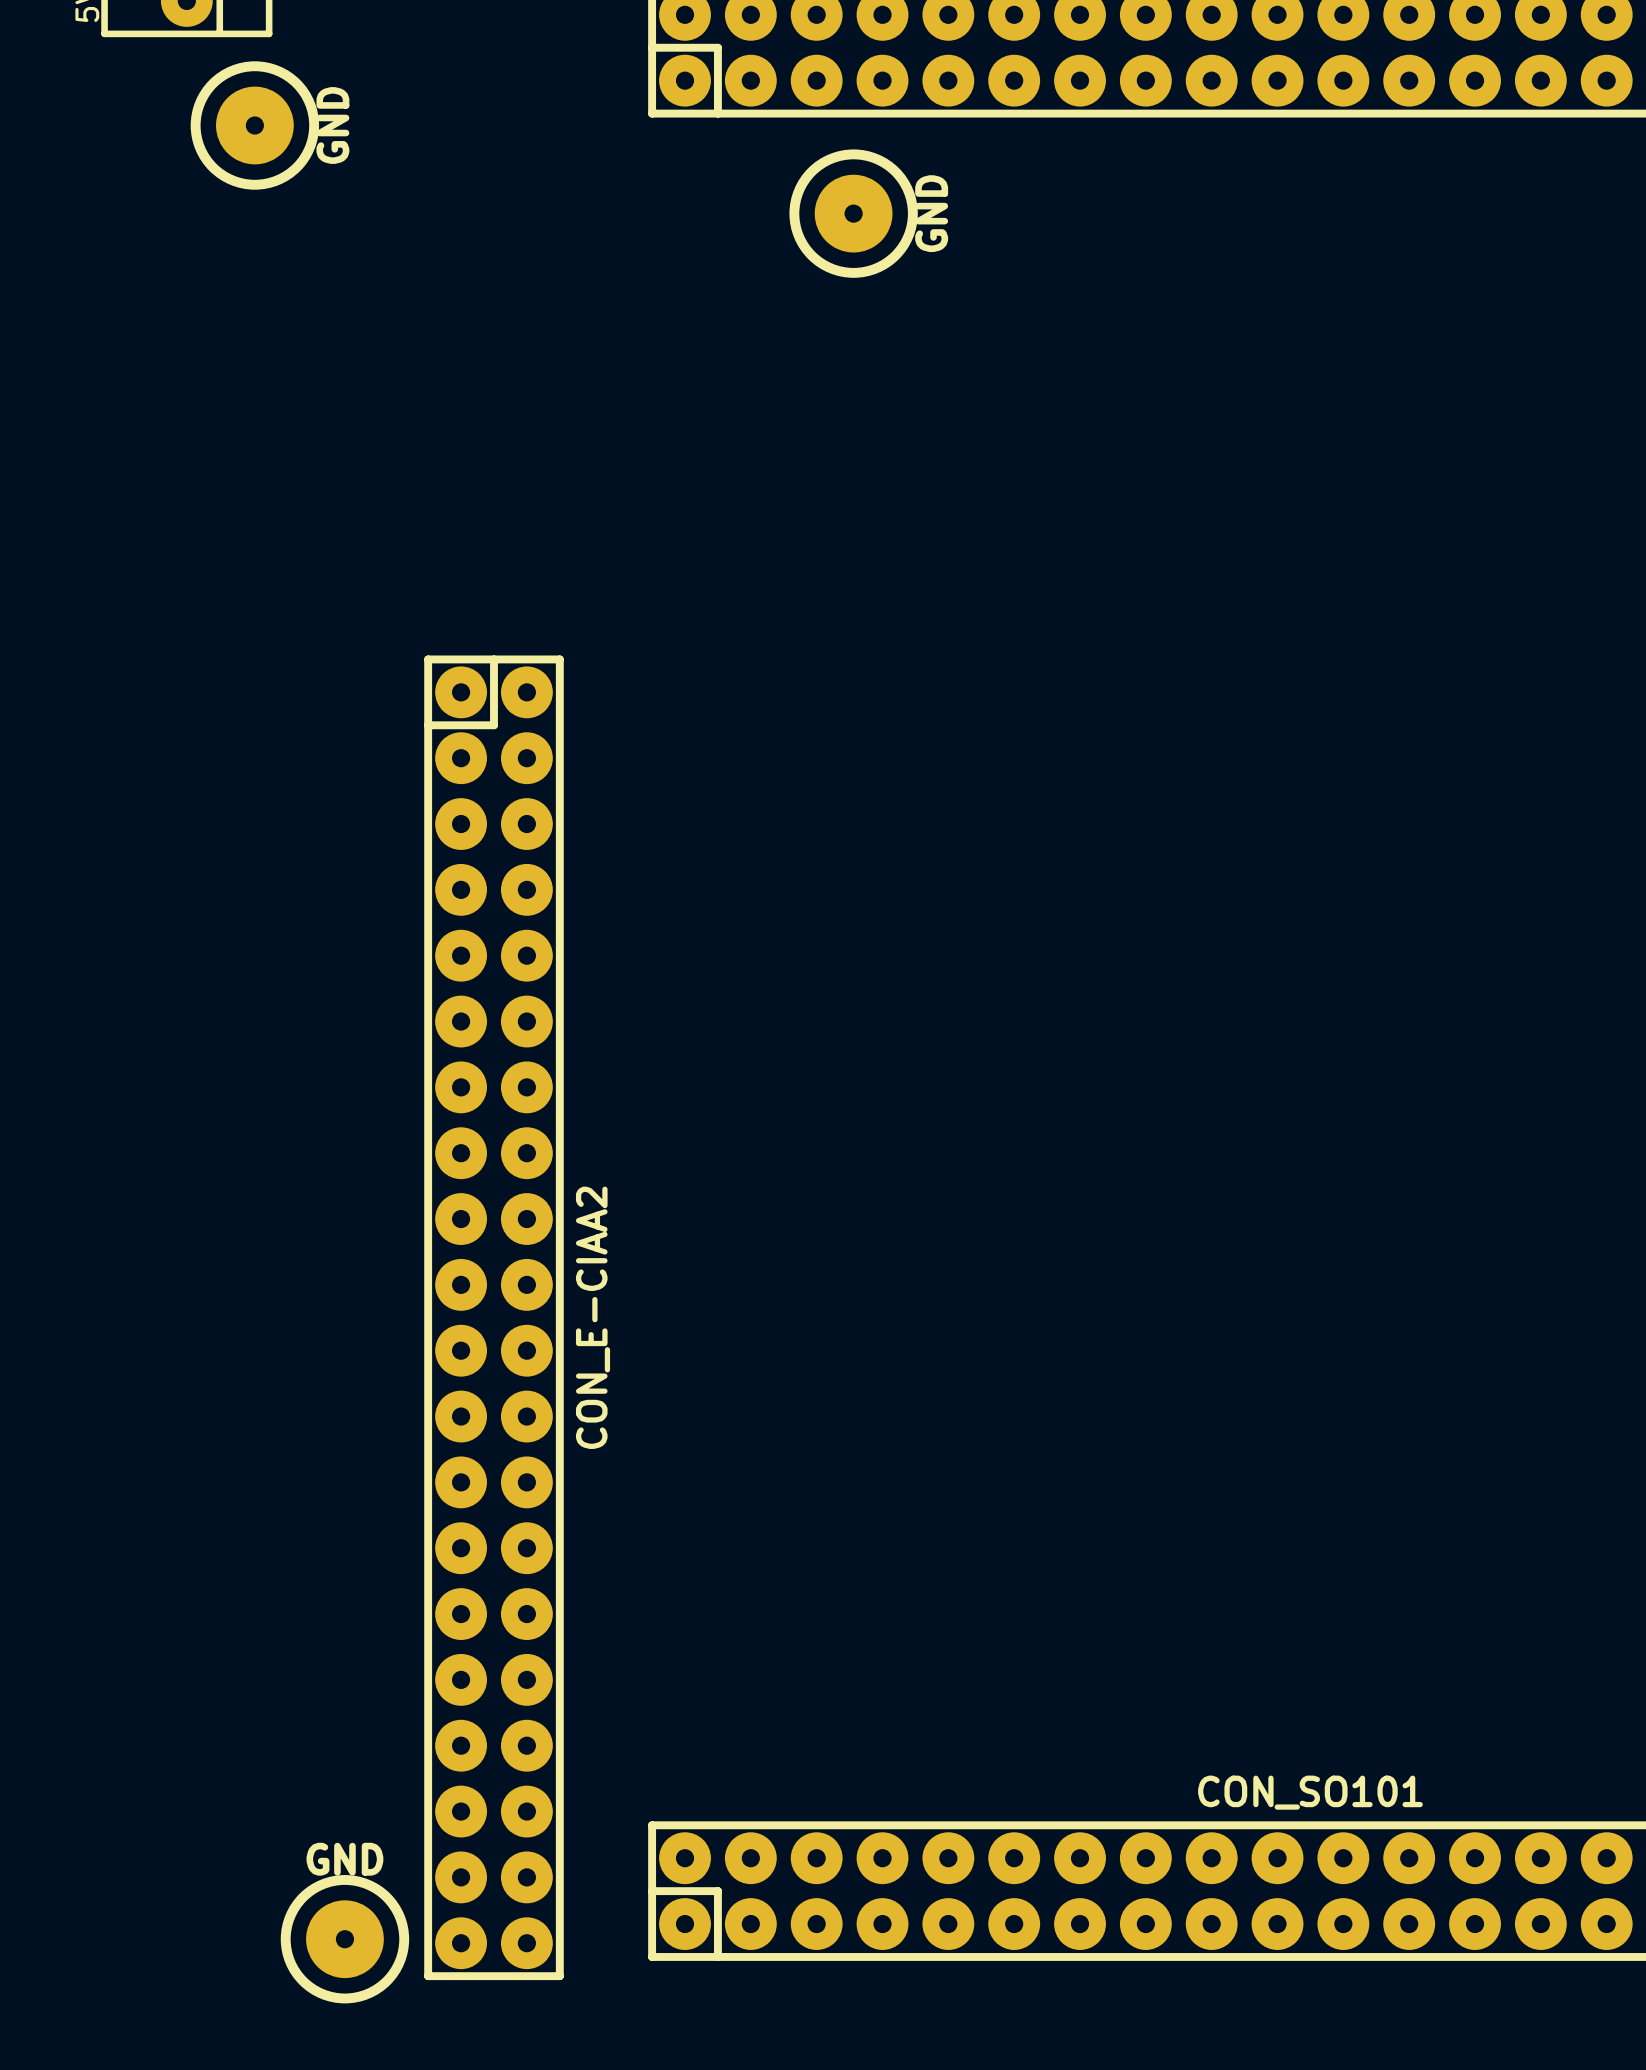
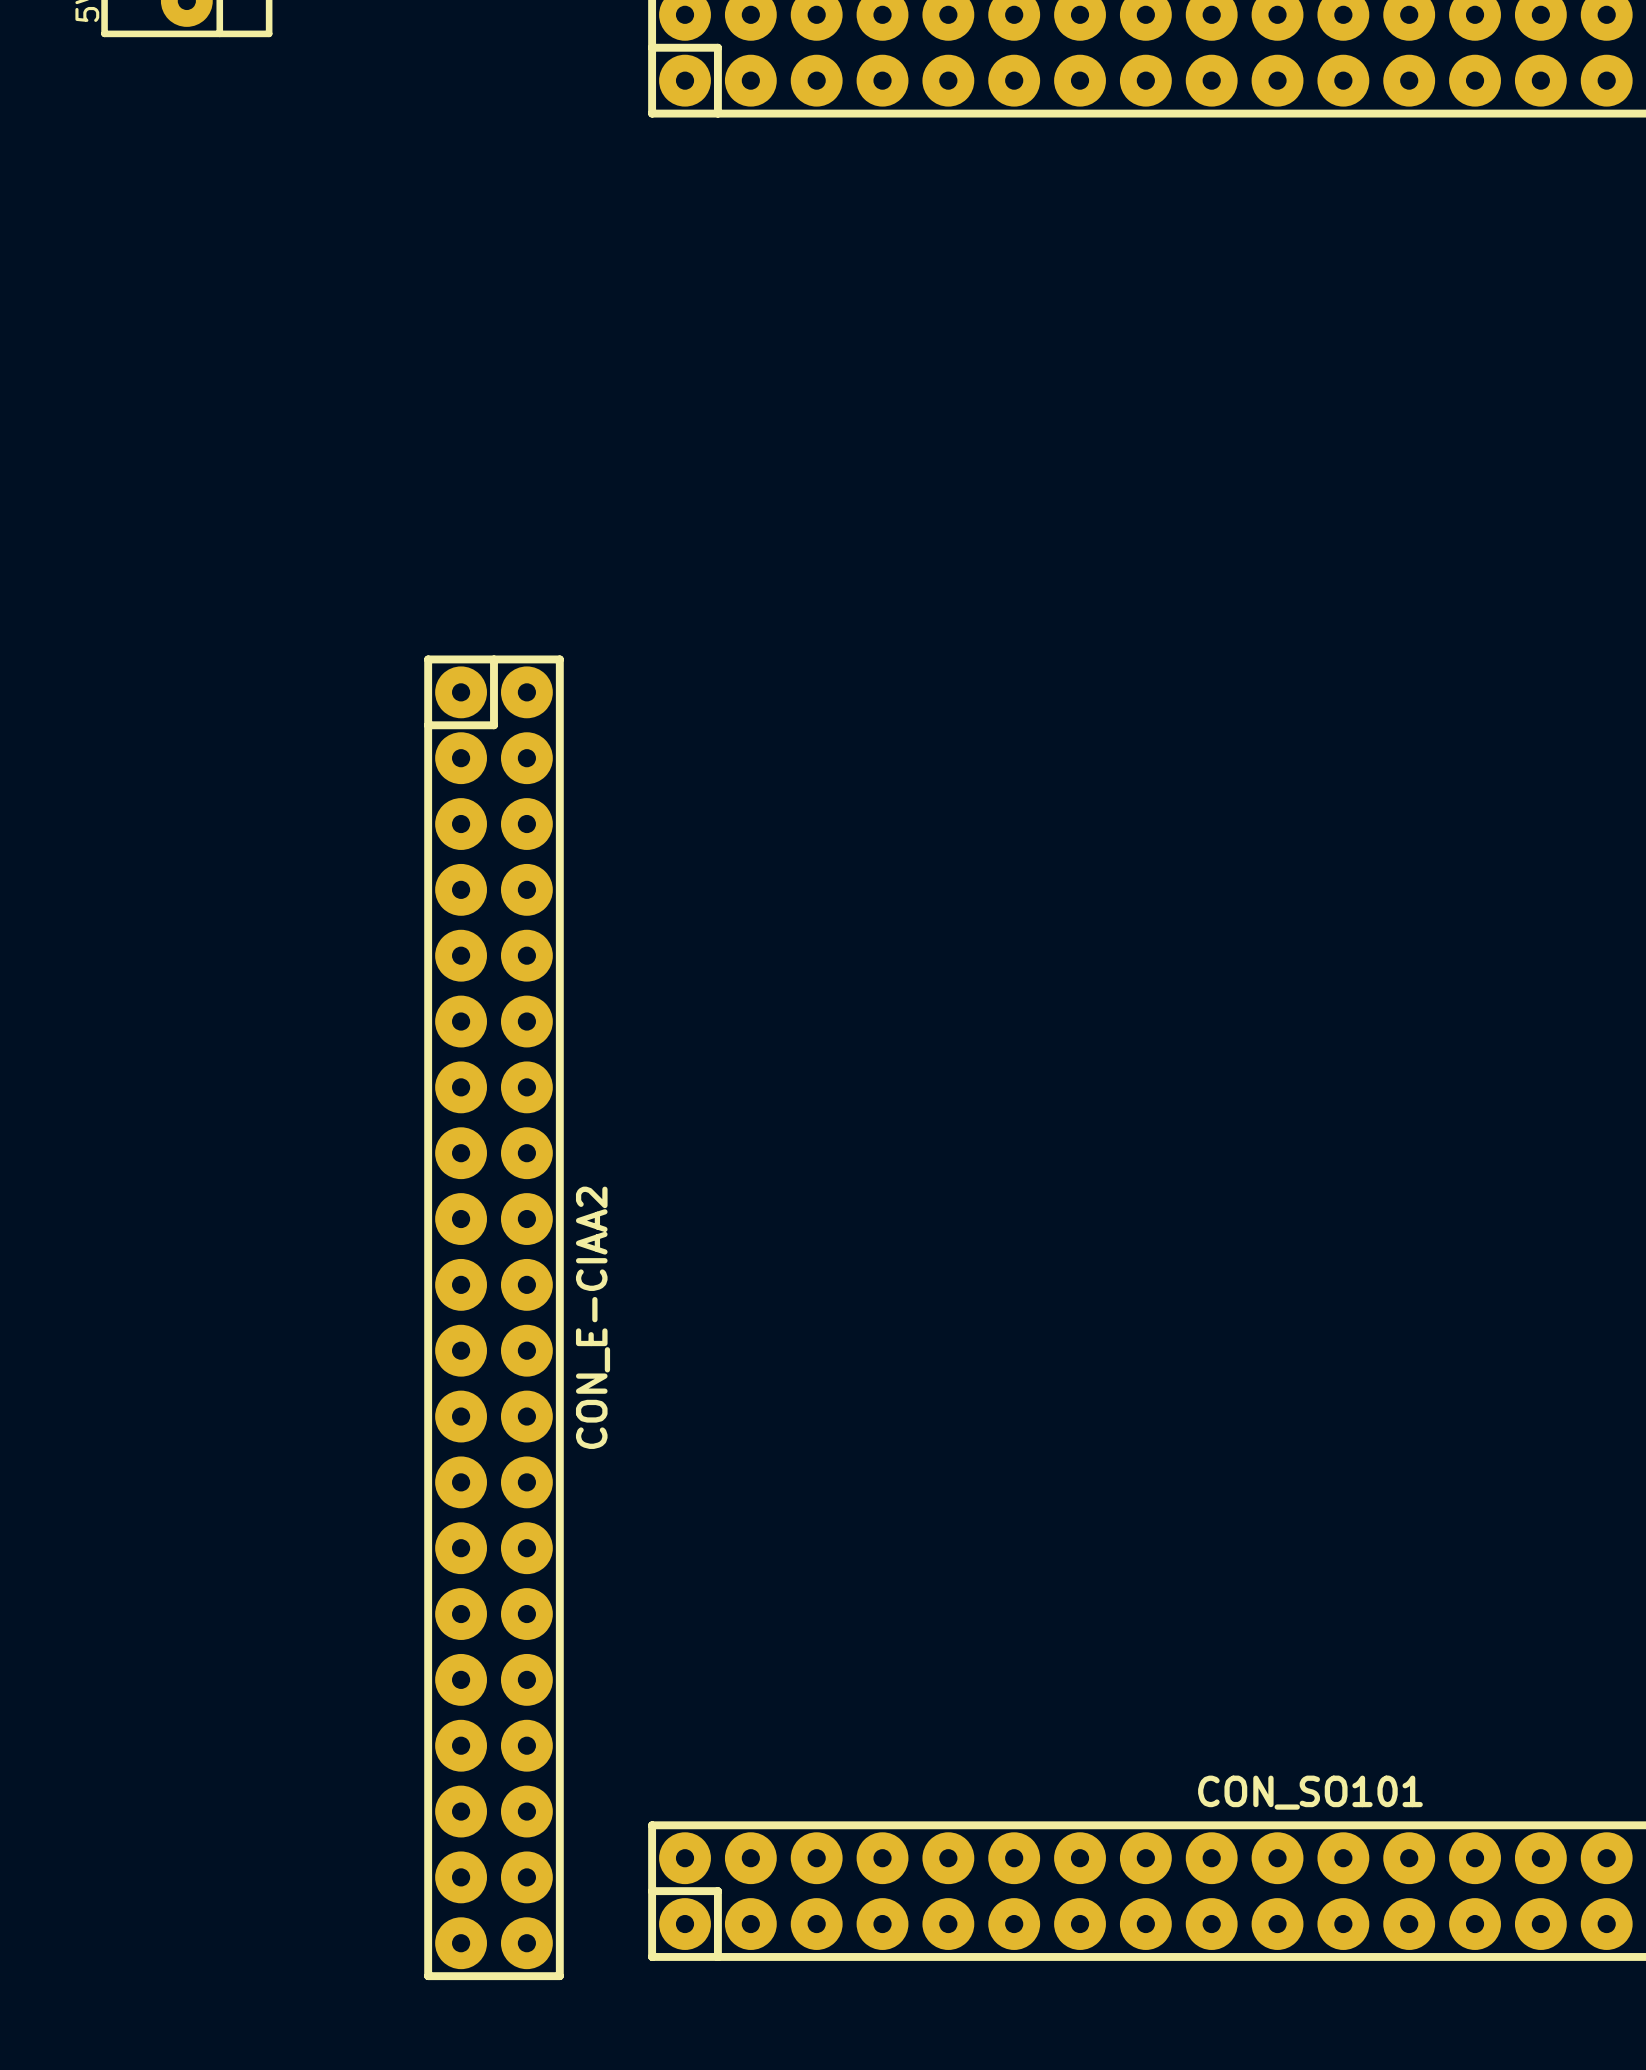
GND: (254, 125) -> none
GND: (853, 213) -> none
GND: (344, 1939) -> none

